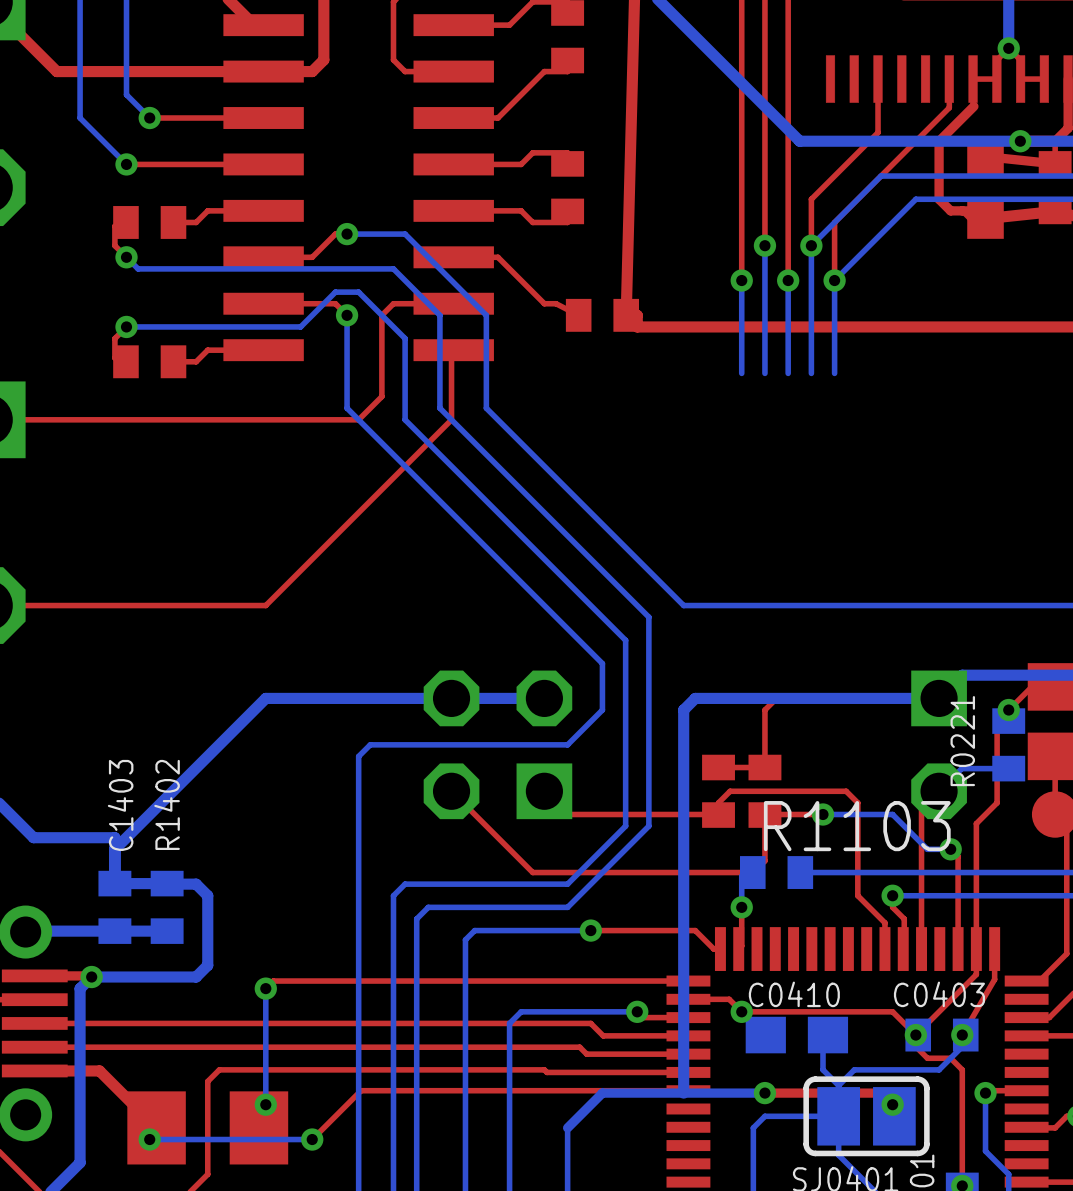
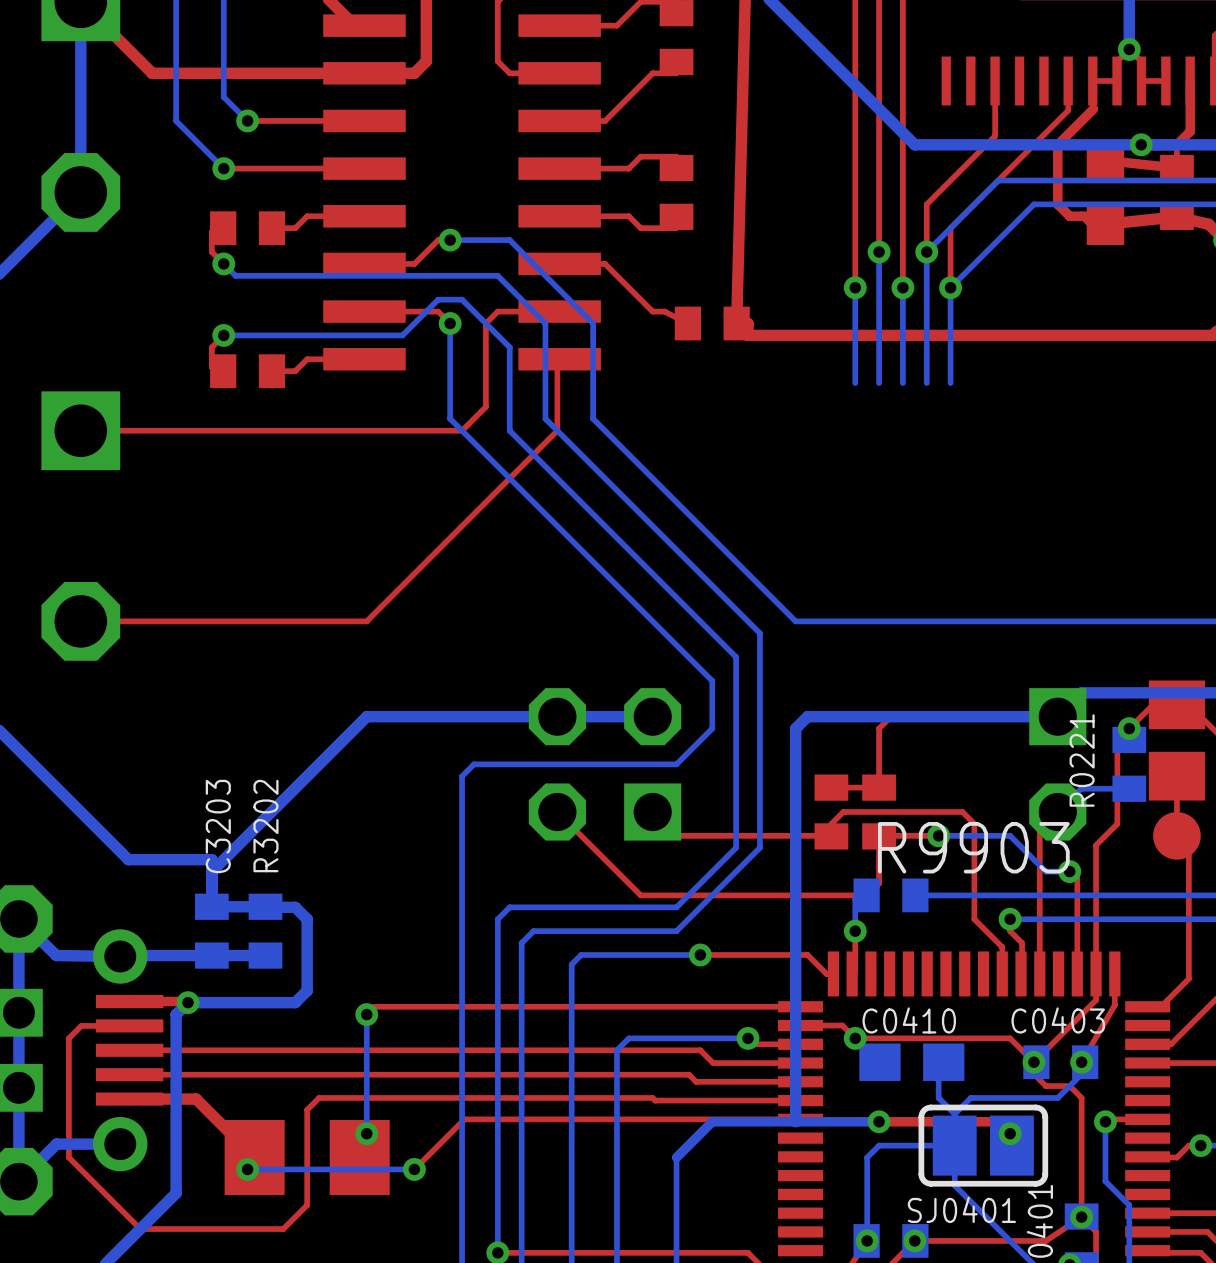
R1402 name: R1402 (167, 804) -> R3202 (265, 826)
C1403 name: C1403 (120, 805) -> C3203 (218, 826)
R1103 name: R1103 (857, 826) -> R9903 (973, 847)

